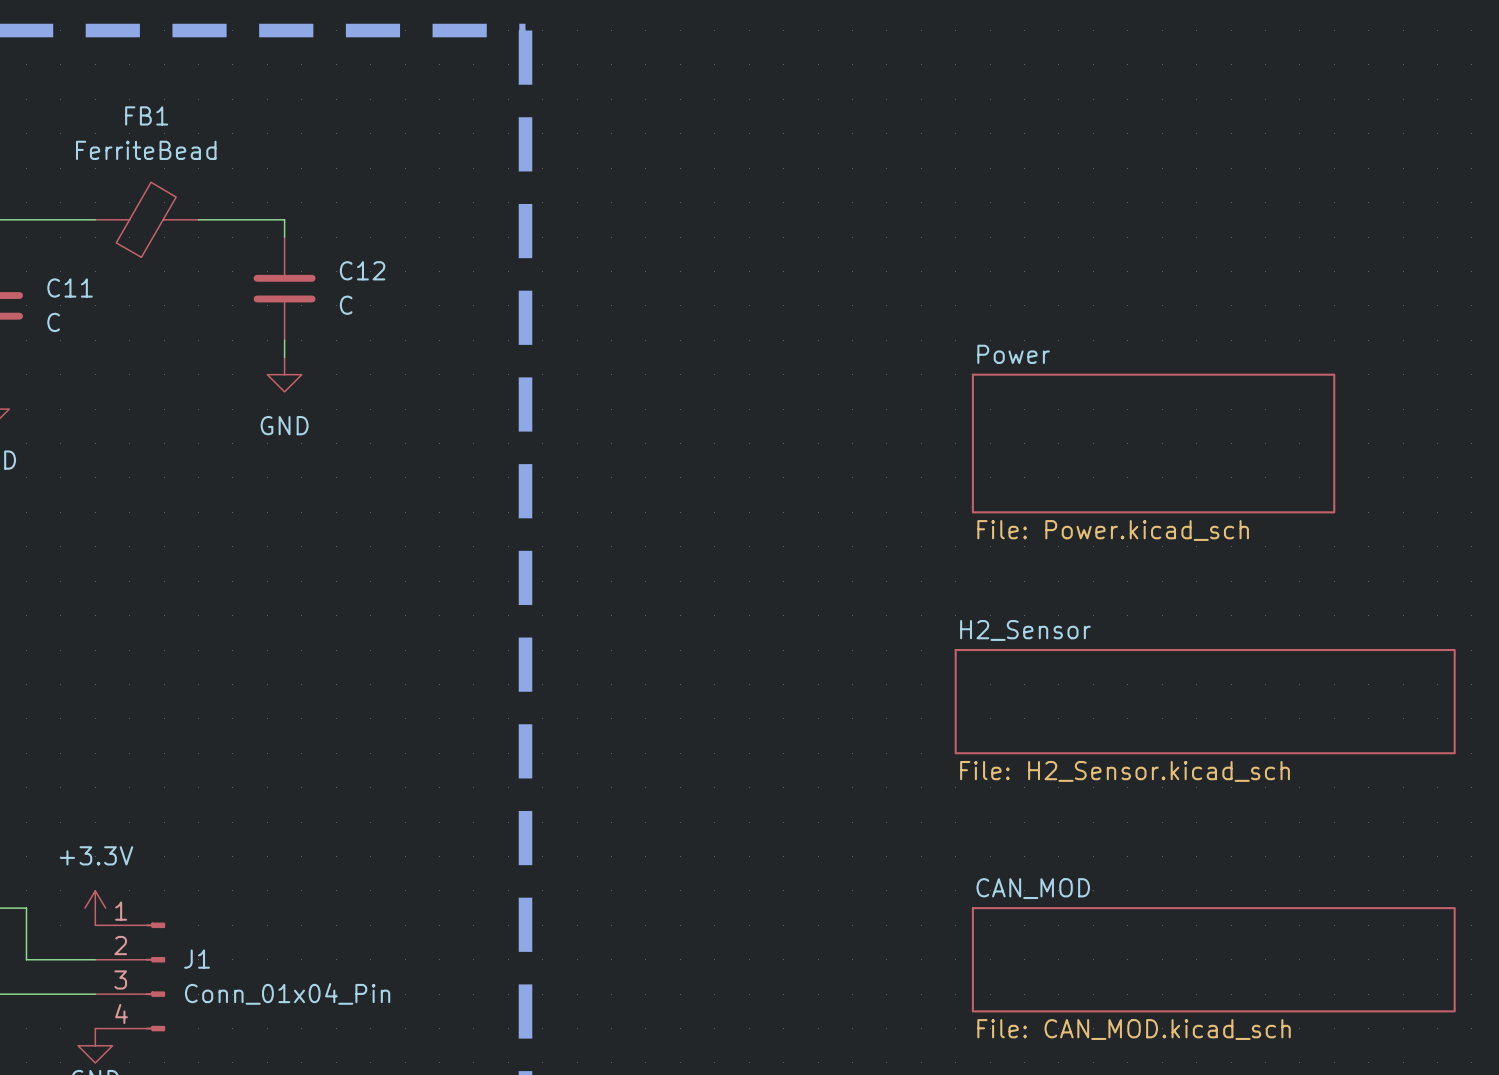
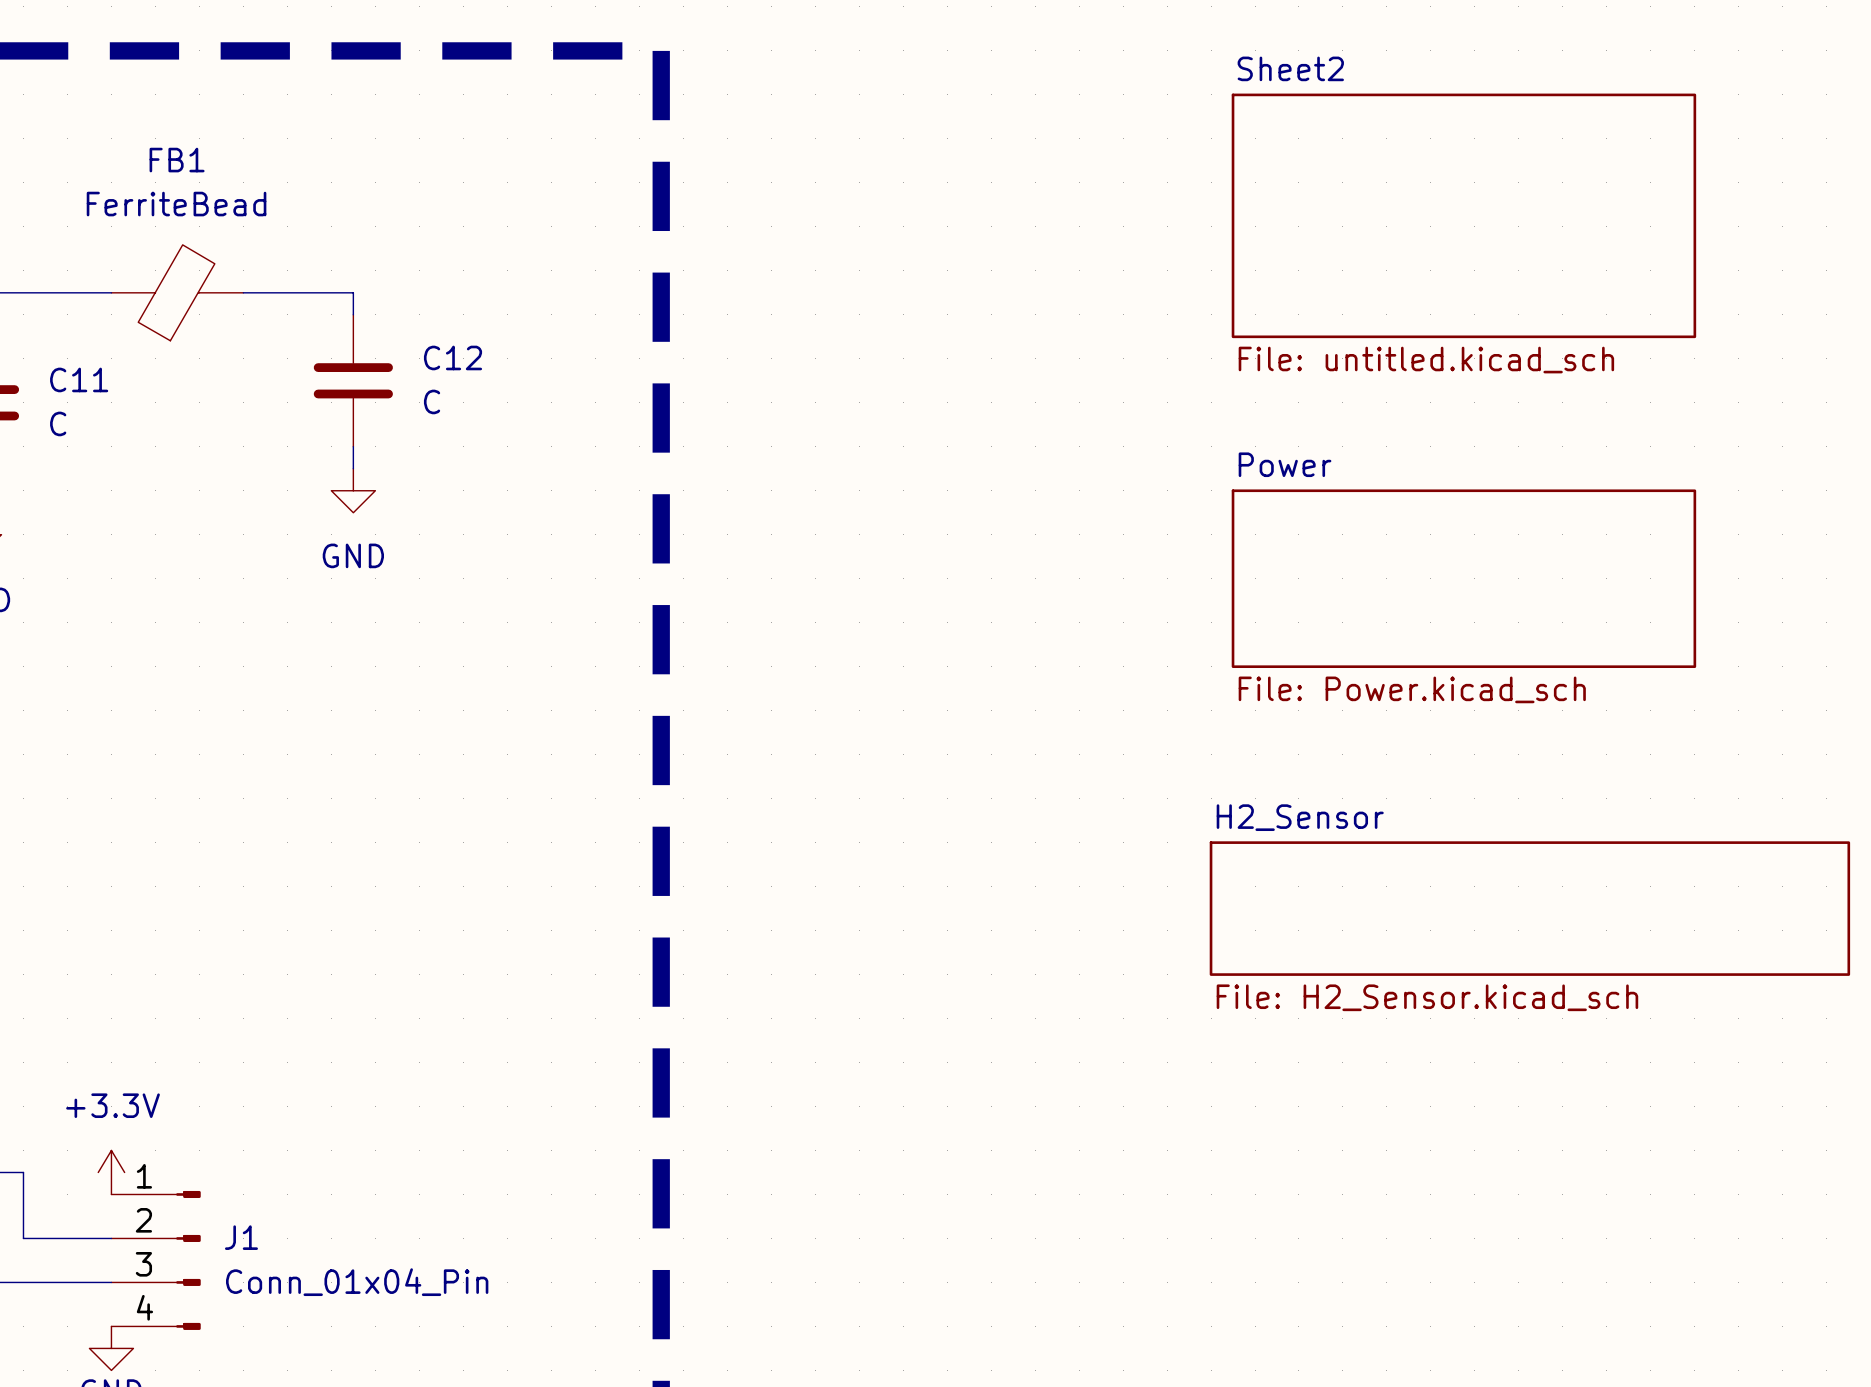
sheet Sheet2: none -> File: untitled.kicad_sch (1463, 215)
sheet CAN_MOD: File: CAN_MOD.kicad_sch (1213, 959) -> none

